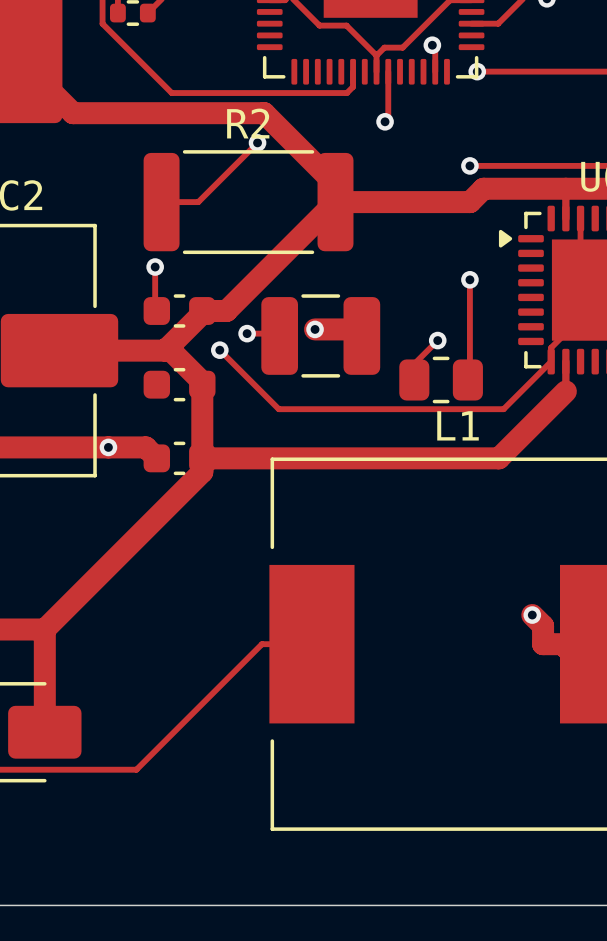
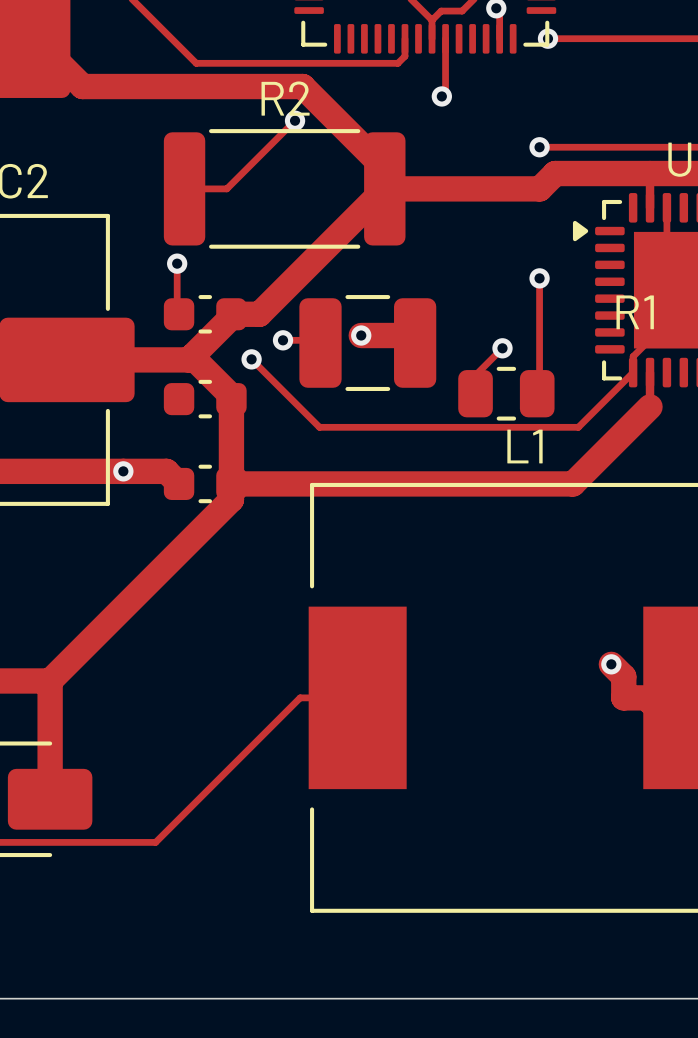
R1 name: none -> R1 (635, 312)

